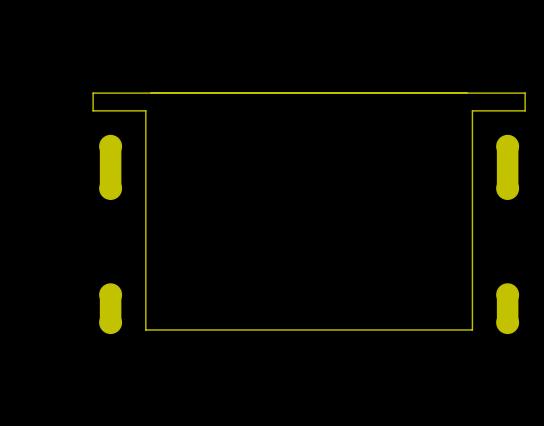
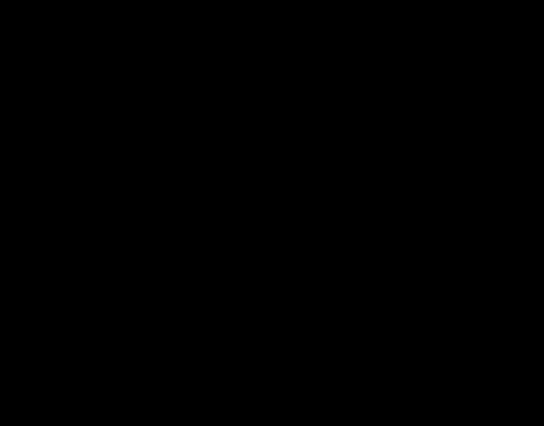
part: (309, 213) -> none

